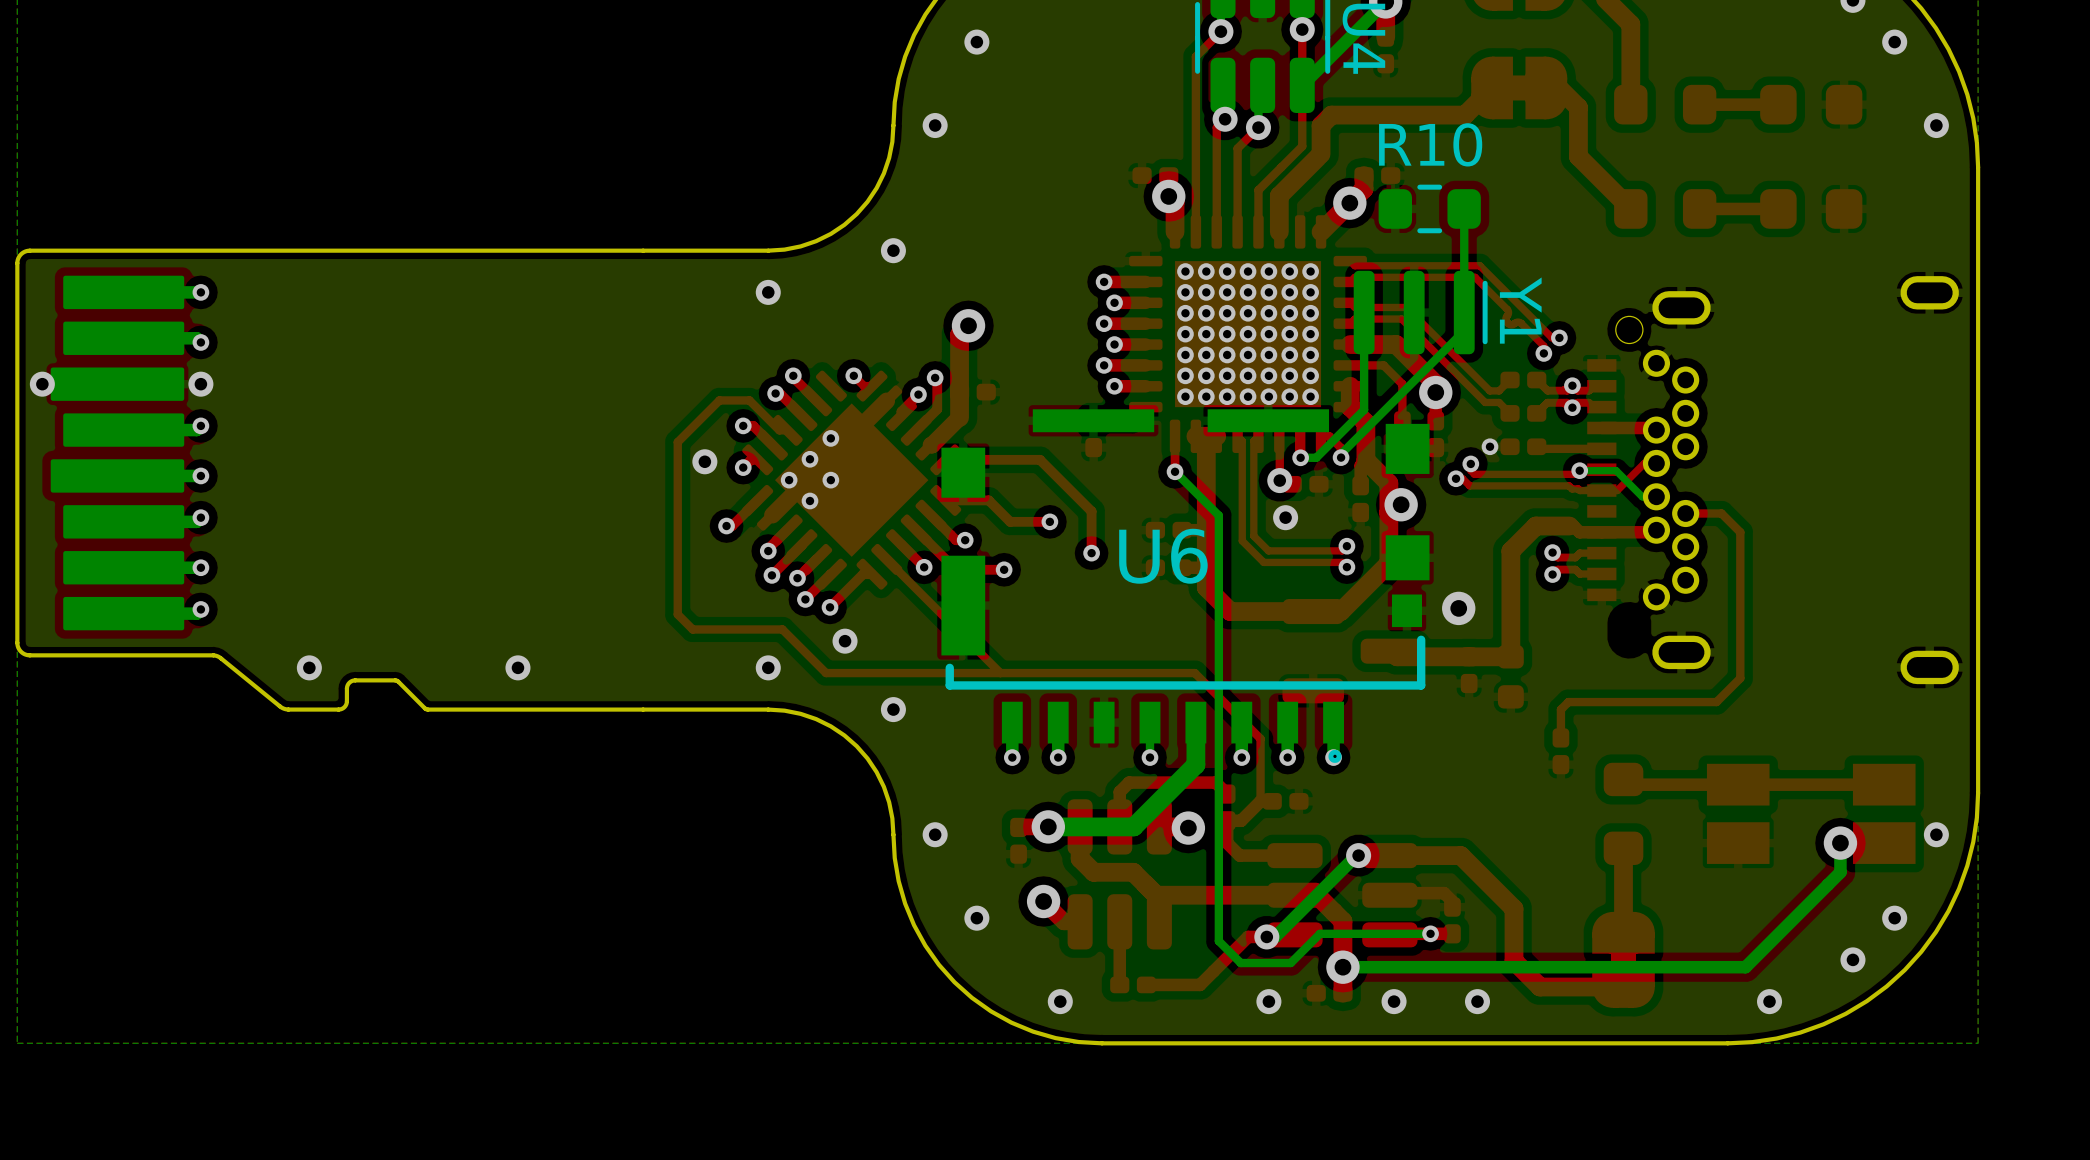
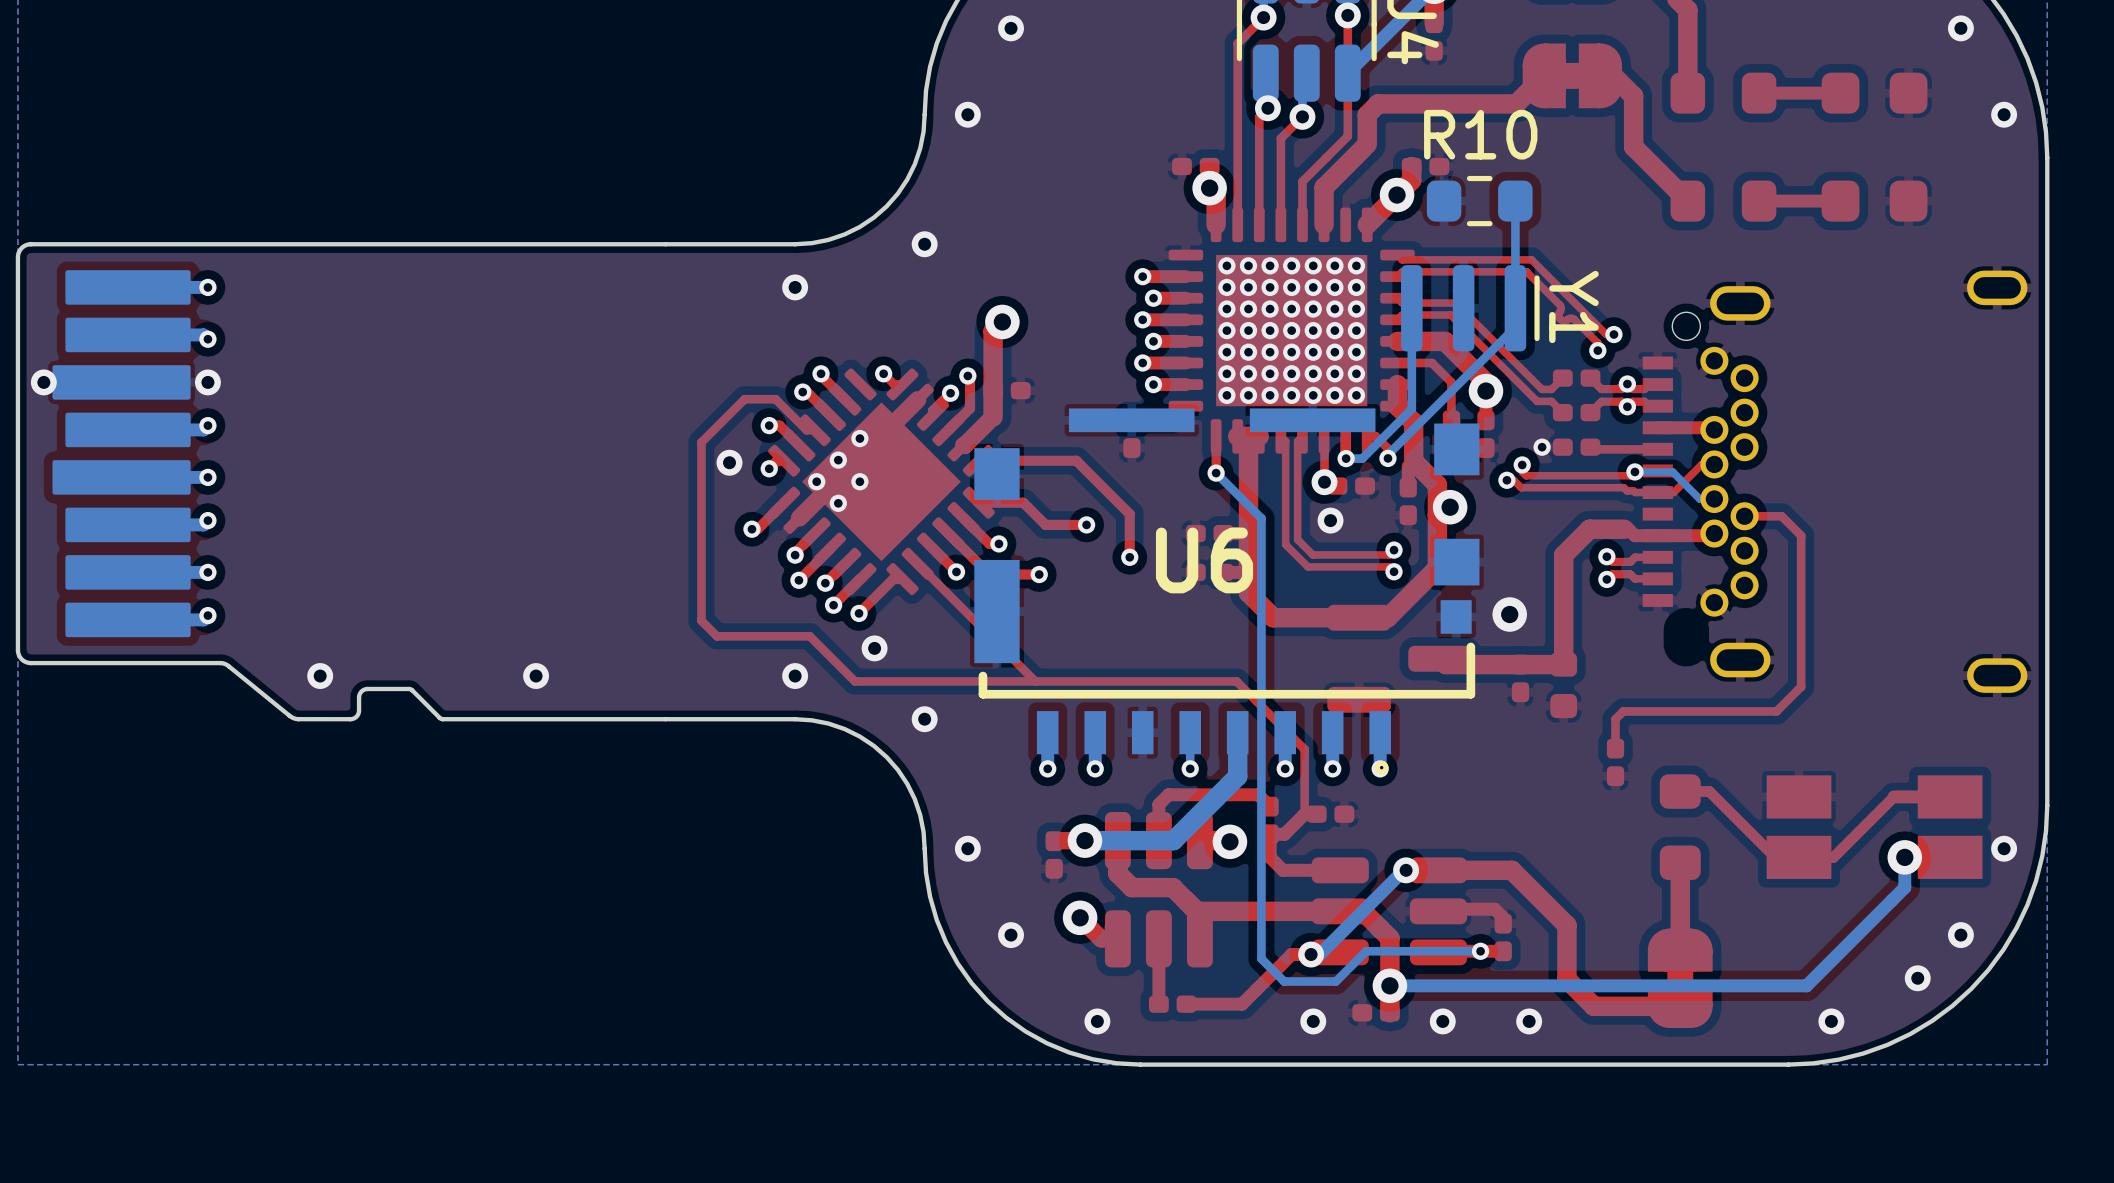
top track: (1830, 784) (1628, 784) -> (1894, 796) (1833, 857) (1775, 857) (1709, 791) (1680, 791)

